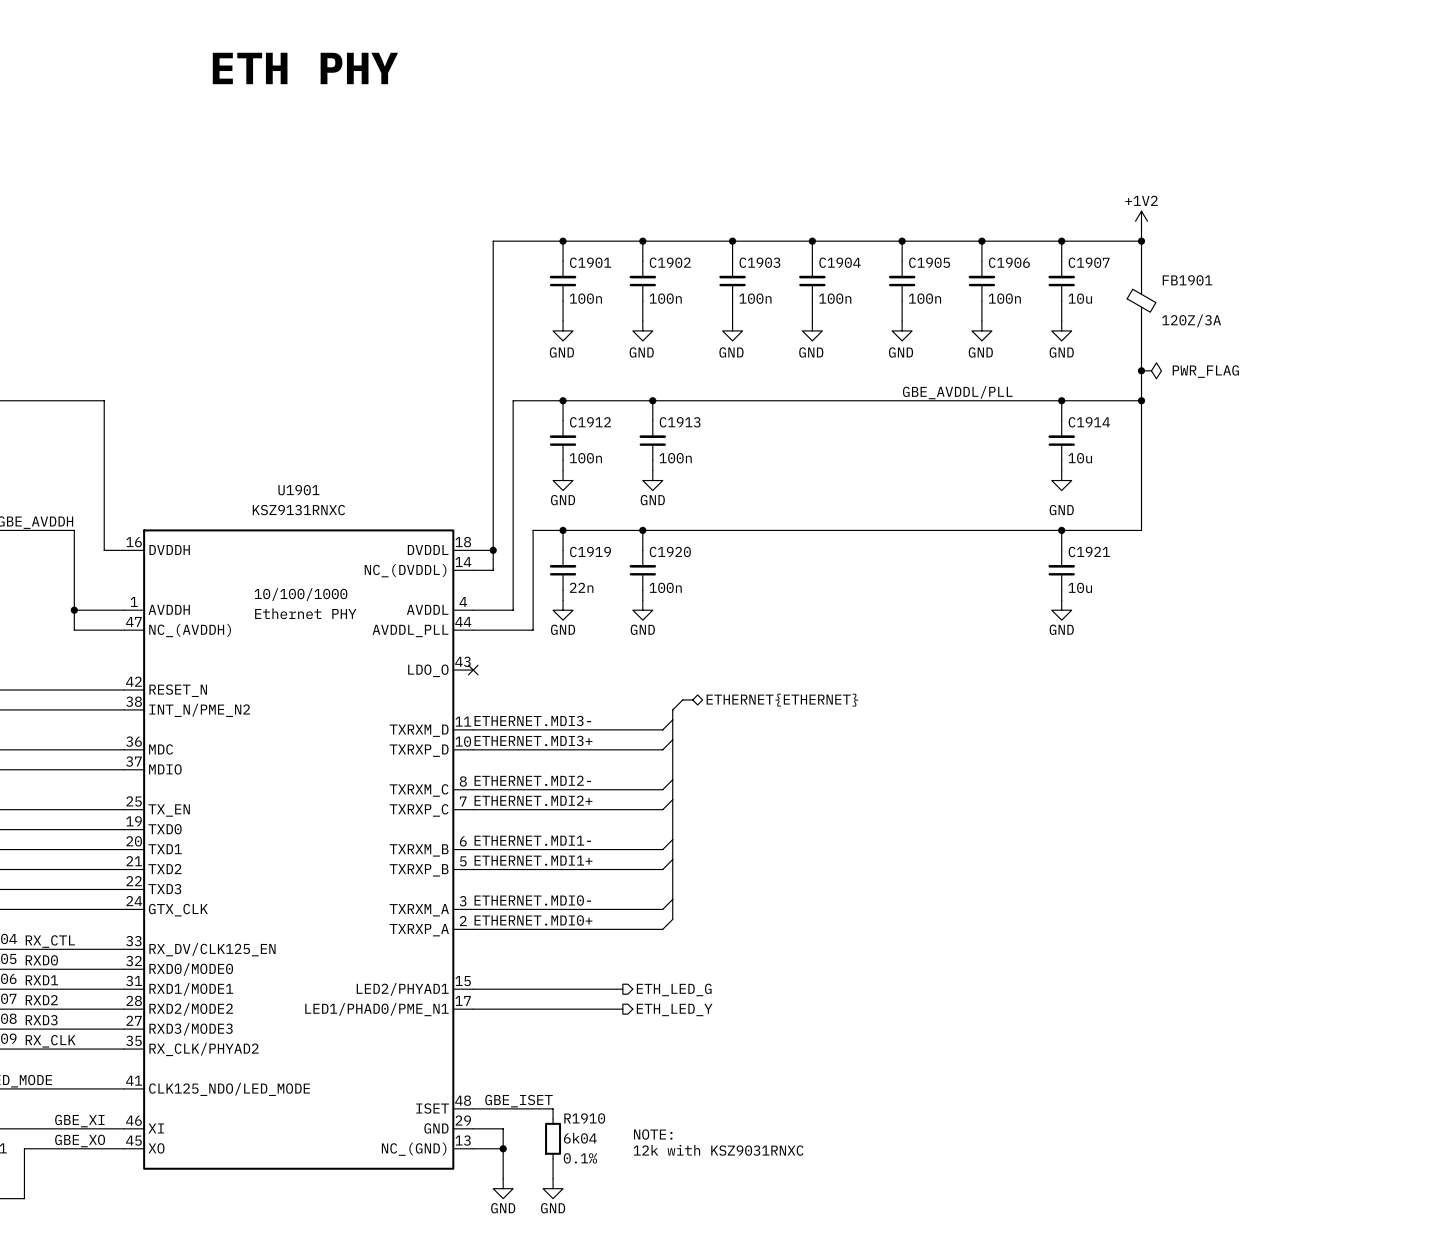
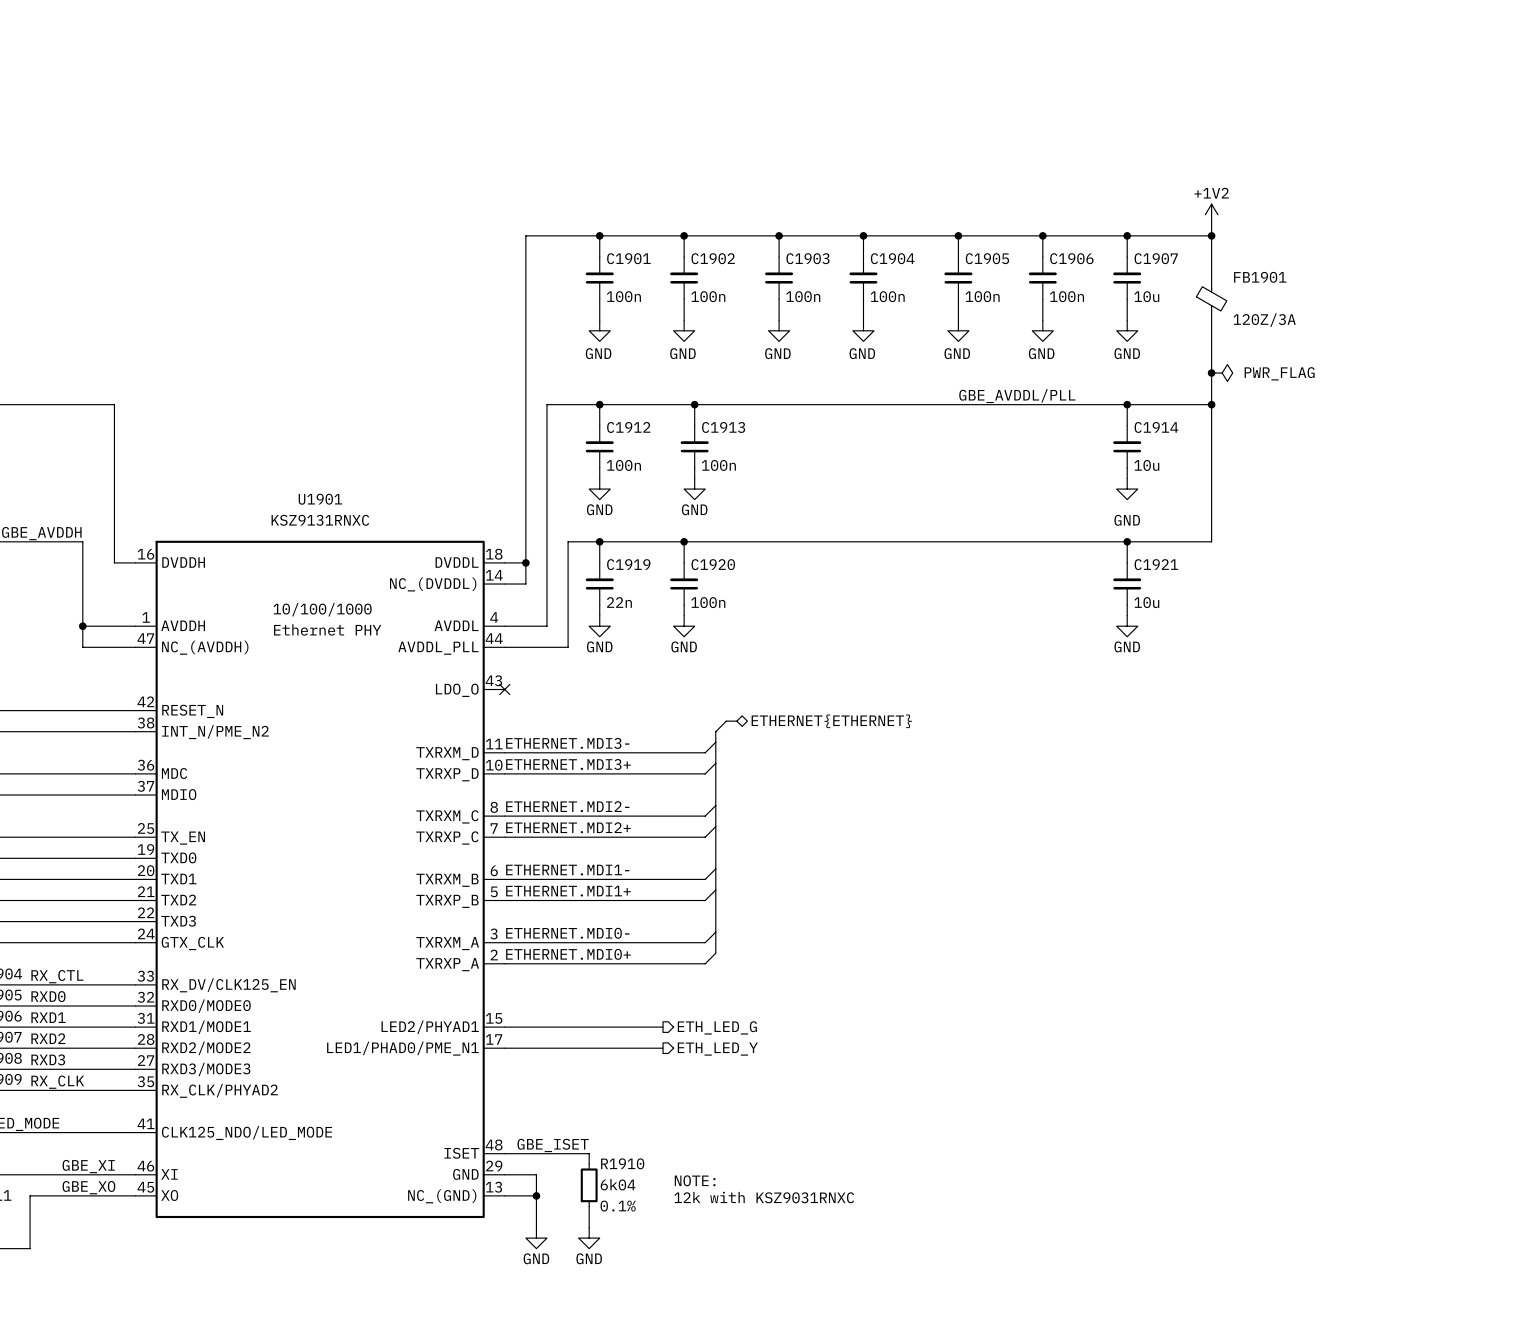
text: ETH PHY (305, 68) -> none

